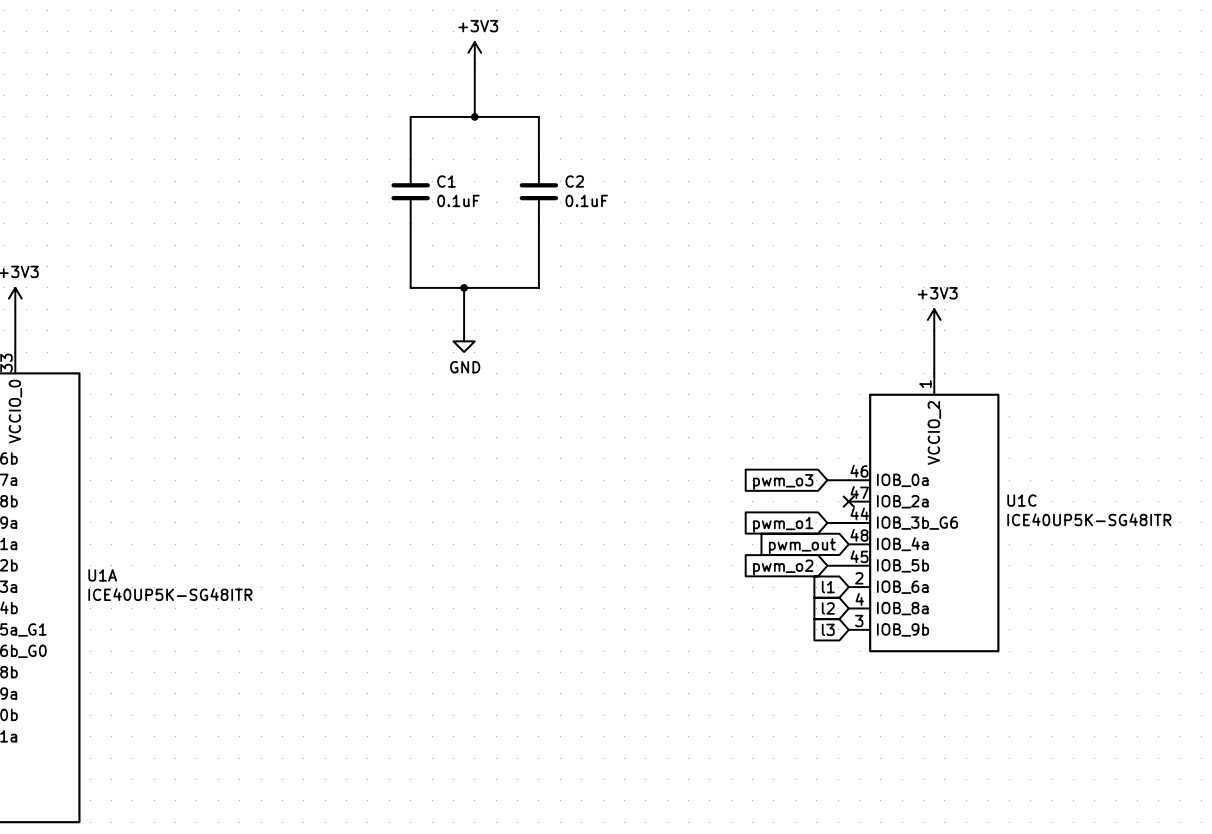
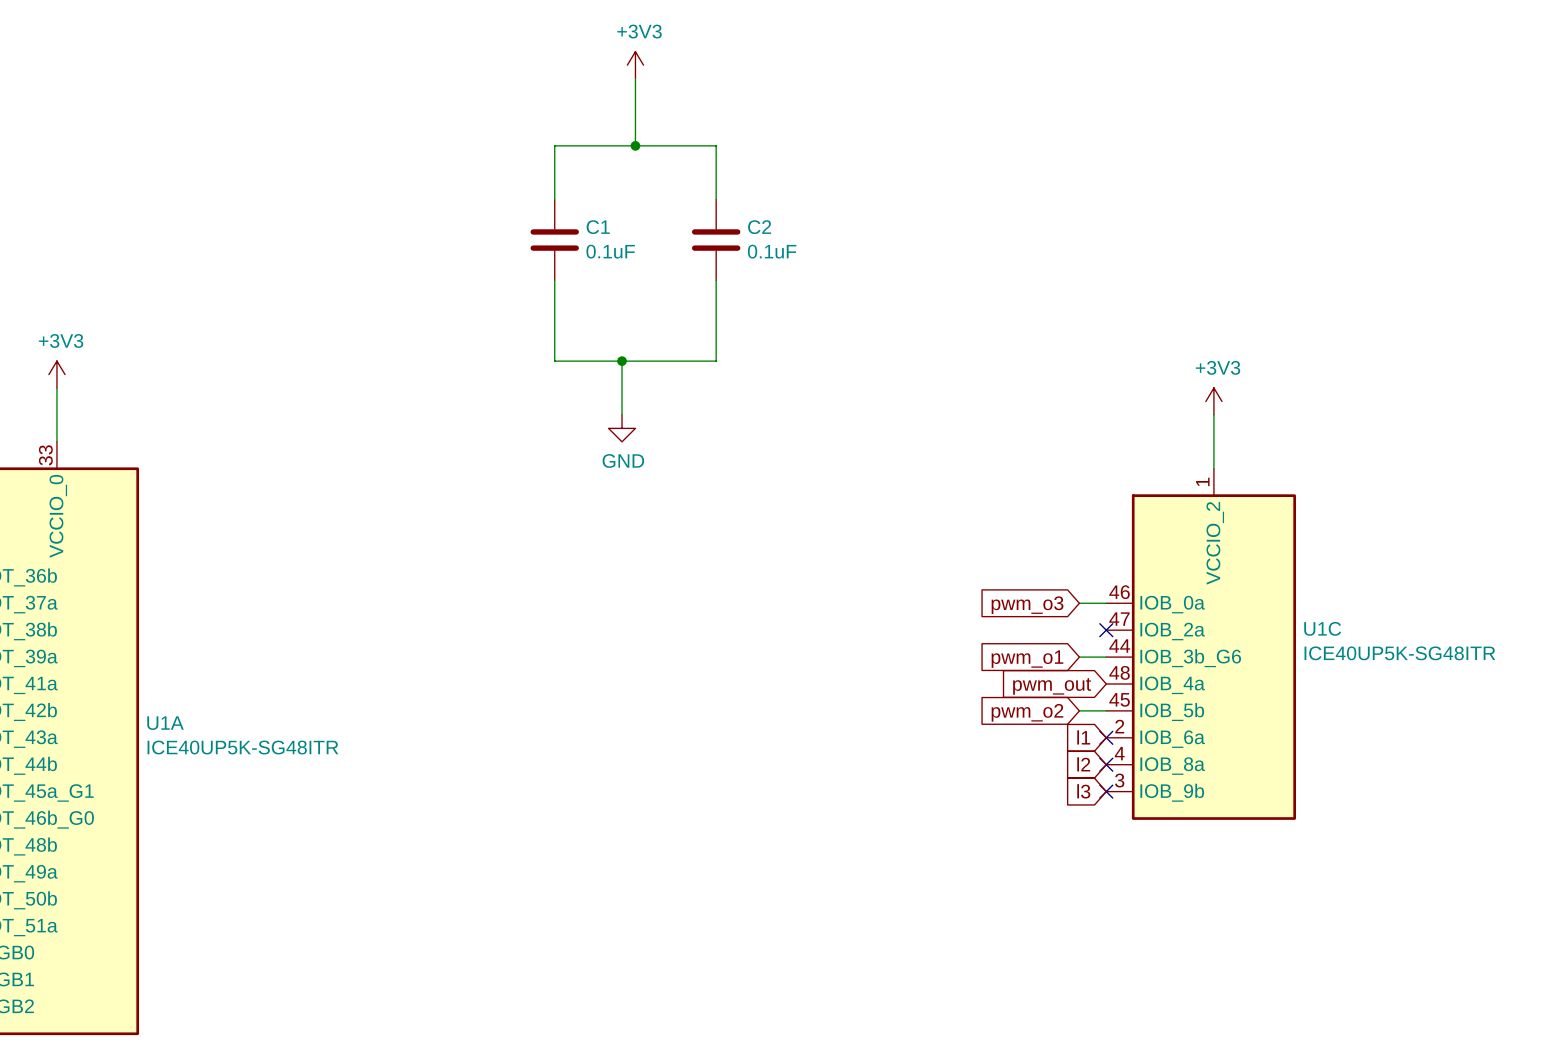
no-connect mark: none -> (1106, 737)
no-connect mark: none -> (1106, 764)
no-connect mark: none -> (1106, 791)

